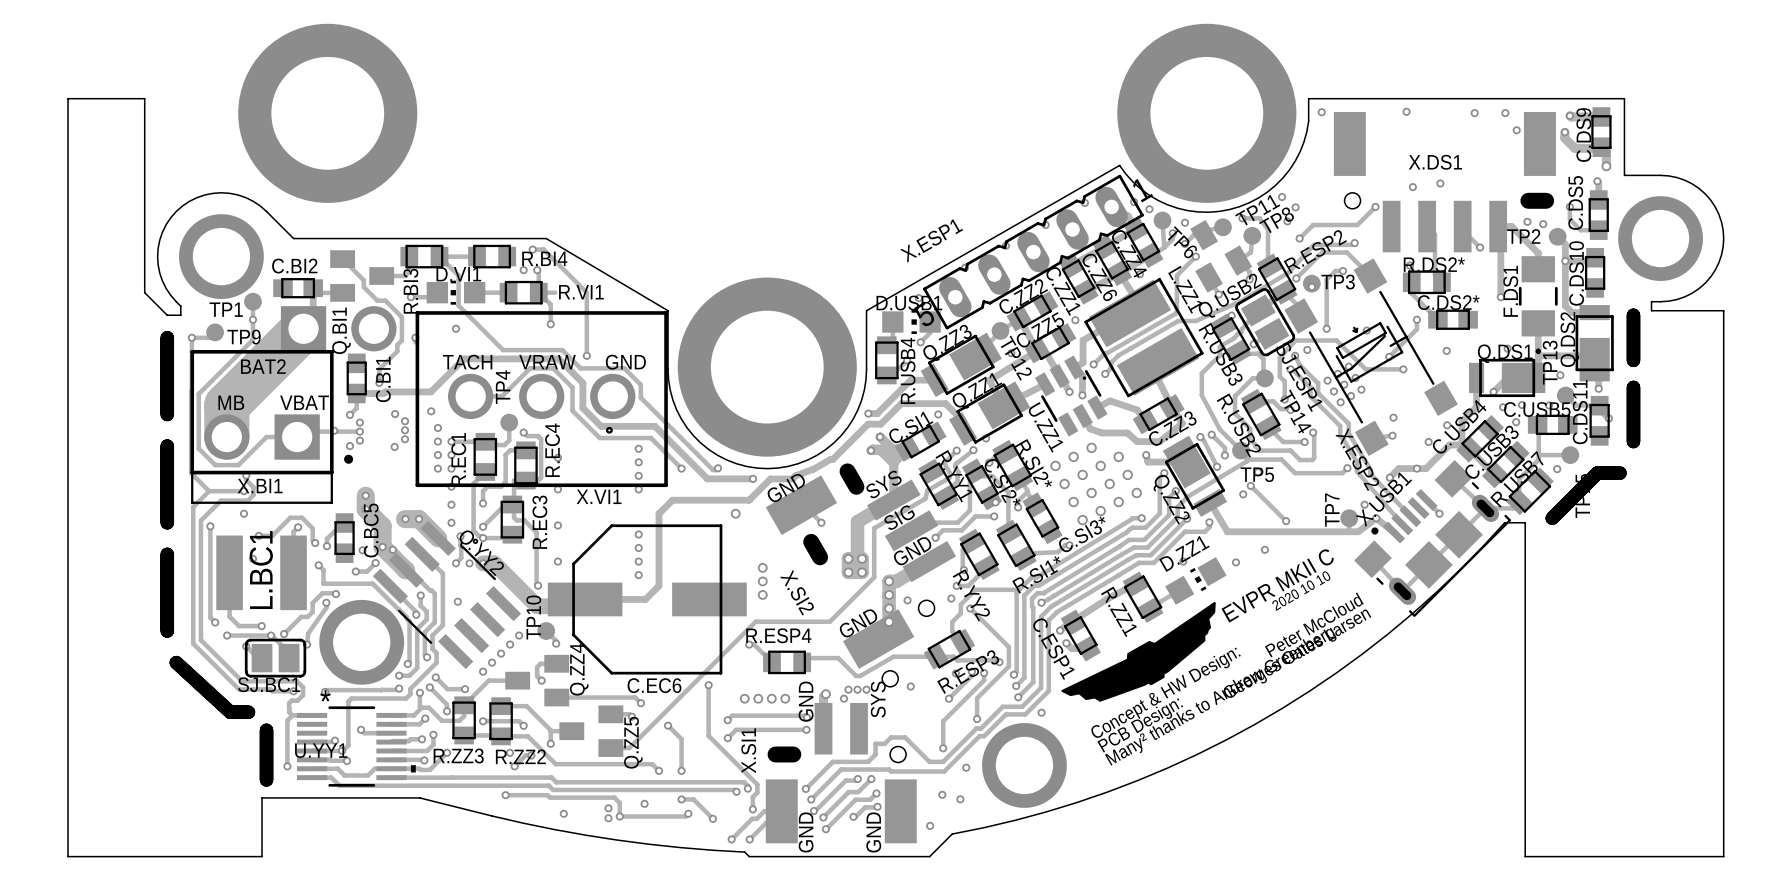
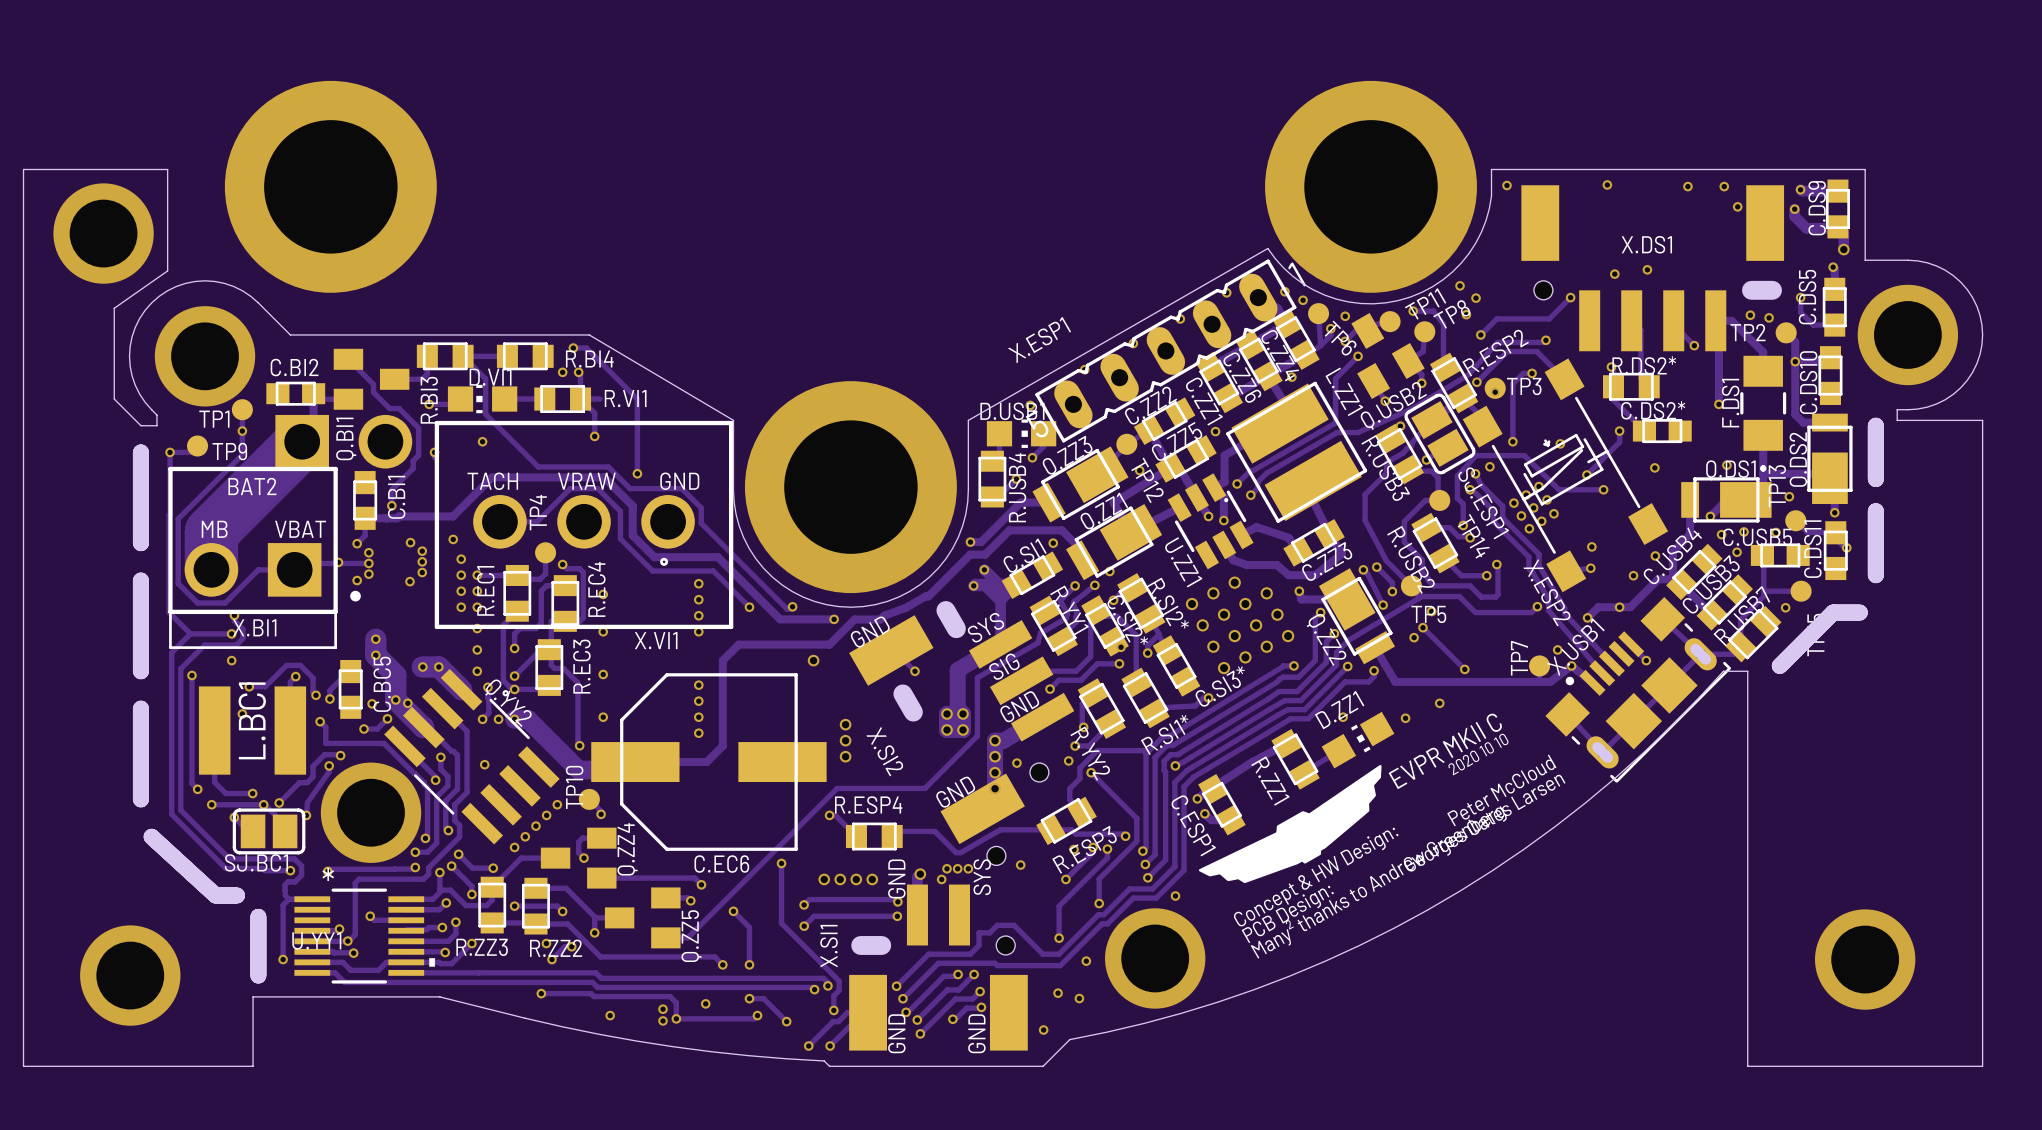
board edge: (144, 98) (144, 215) -> (114, 169) (167, 169) (167, 270) (114, 308)
via: none -> (103, 233)
via: none -> (1865, 959)
via: none -> (130, 975)

